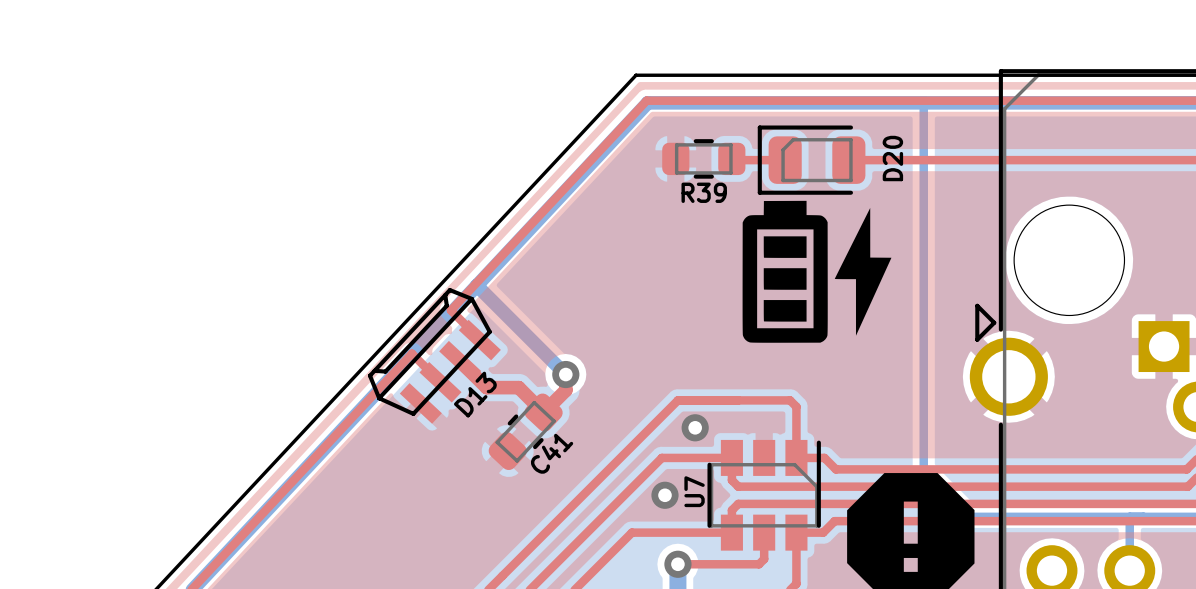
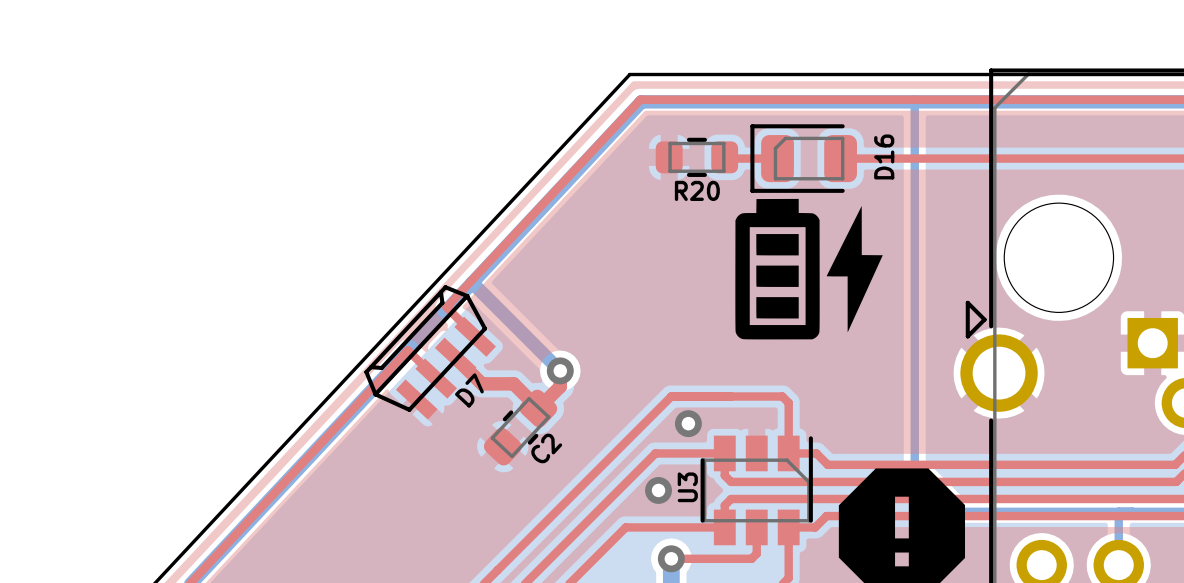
D20 name: D20 (892, 158) -> D16 (884, 156)
R39 name: R39 (704, 192) -> R20 (697, 190)
D13 name: D13 (475, 394) -> D7 (469, 390)
C41 name: C41 (552, 453) -> C2 (546, 448)
U7 name: U7 (694, 491) -> U3 (687, 487)

